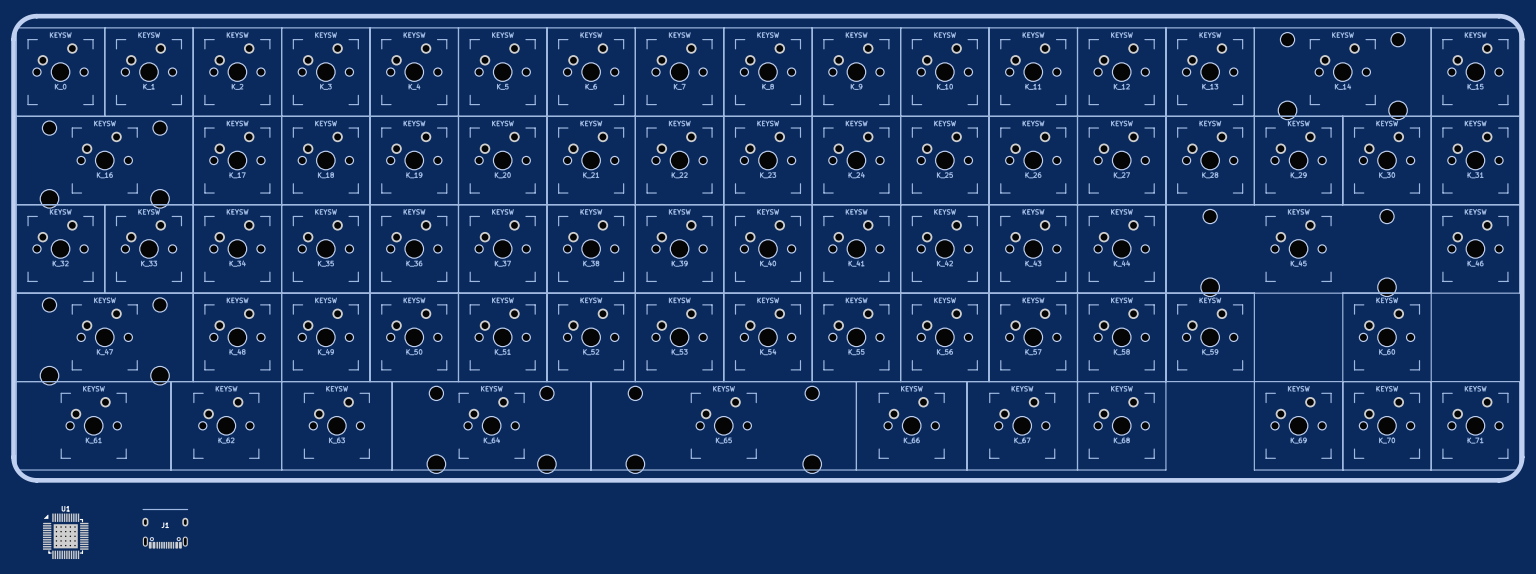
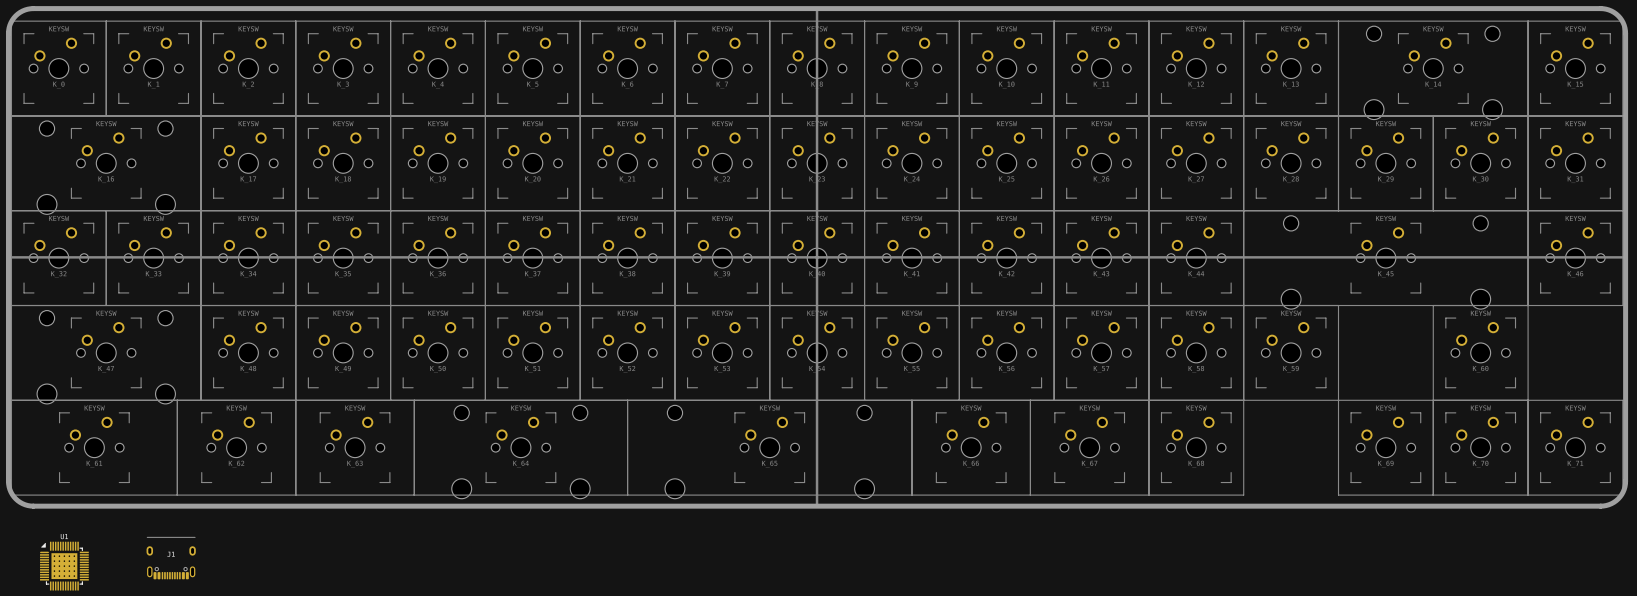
line: none -> (817, 8) (817, 506)
line: none -> (8, 257) (1625, 257)

